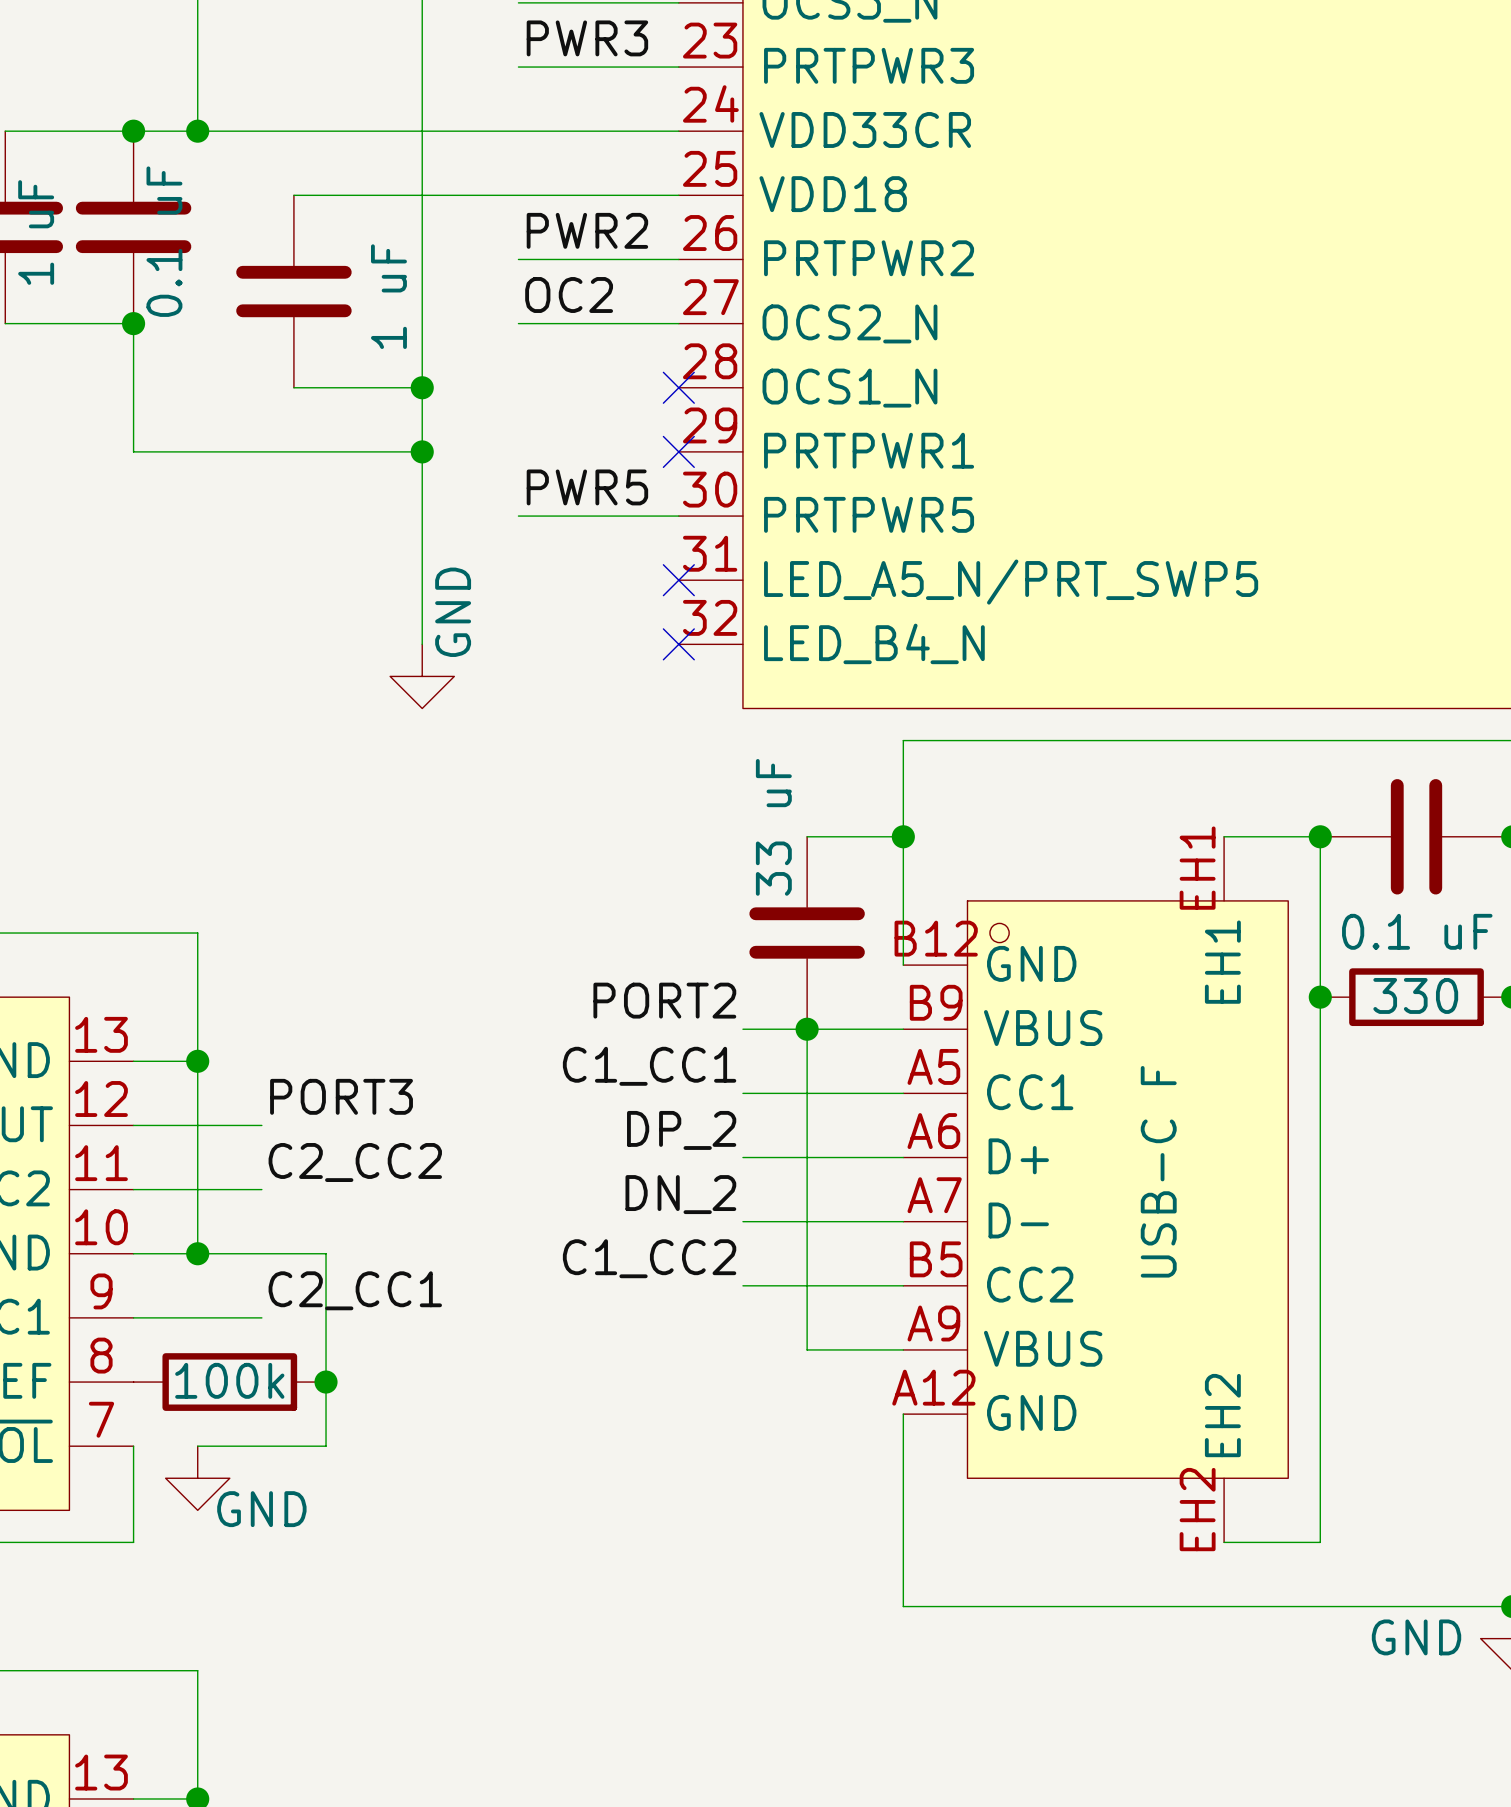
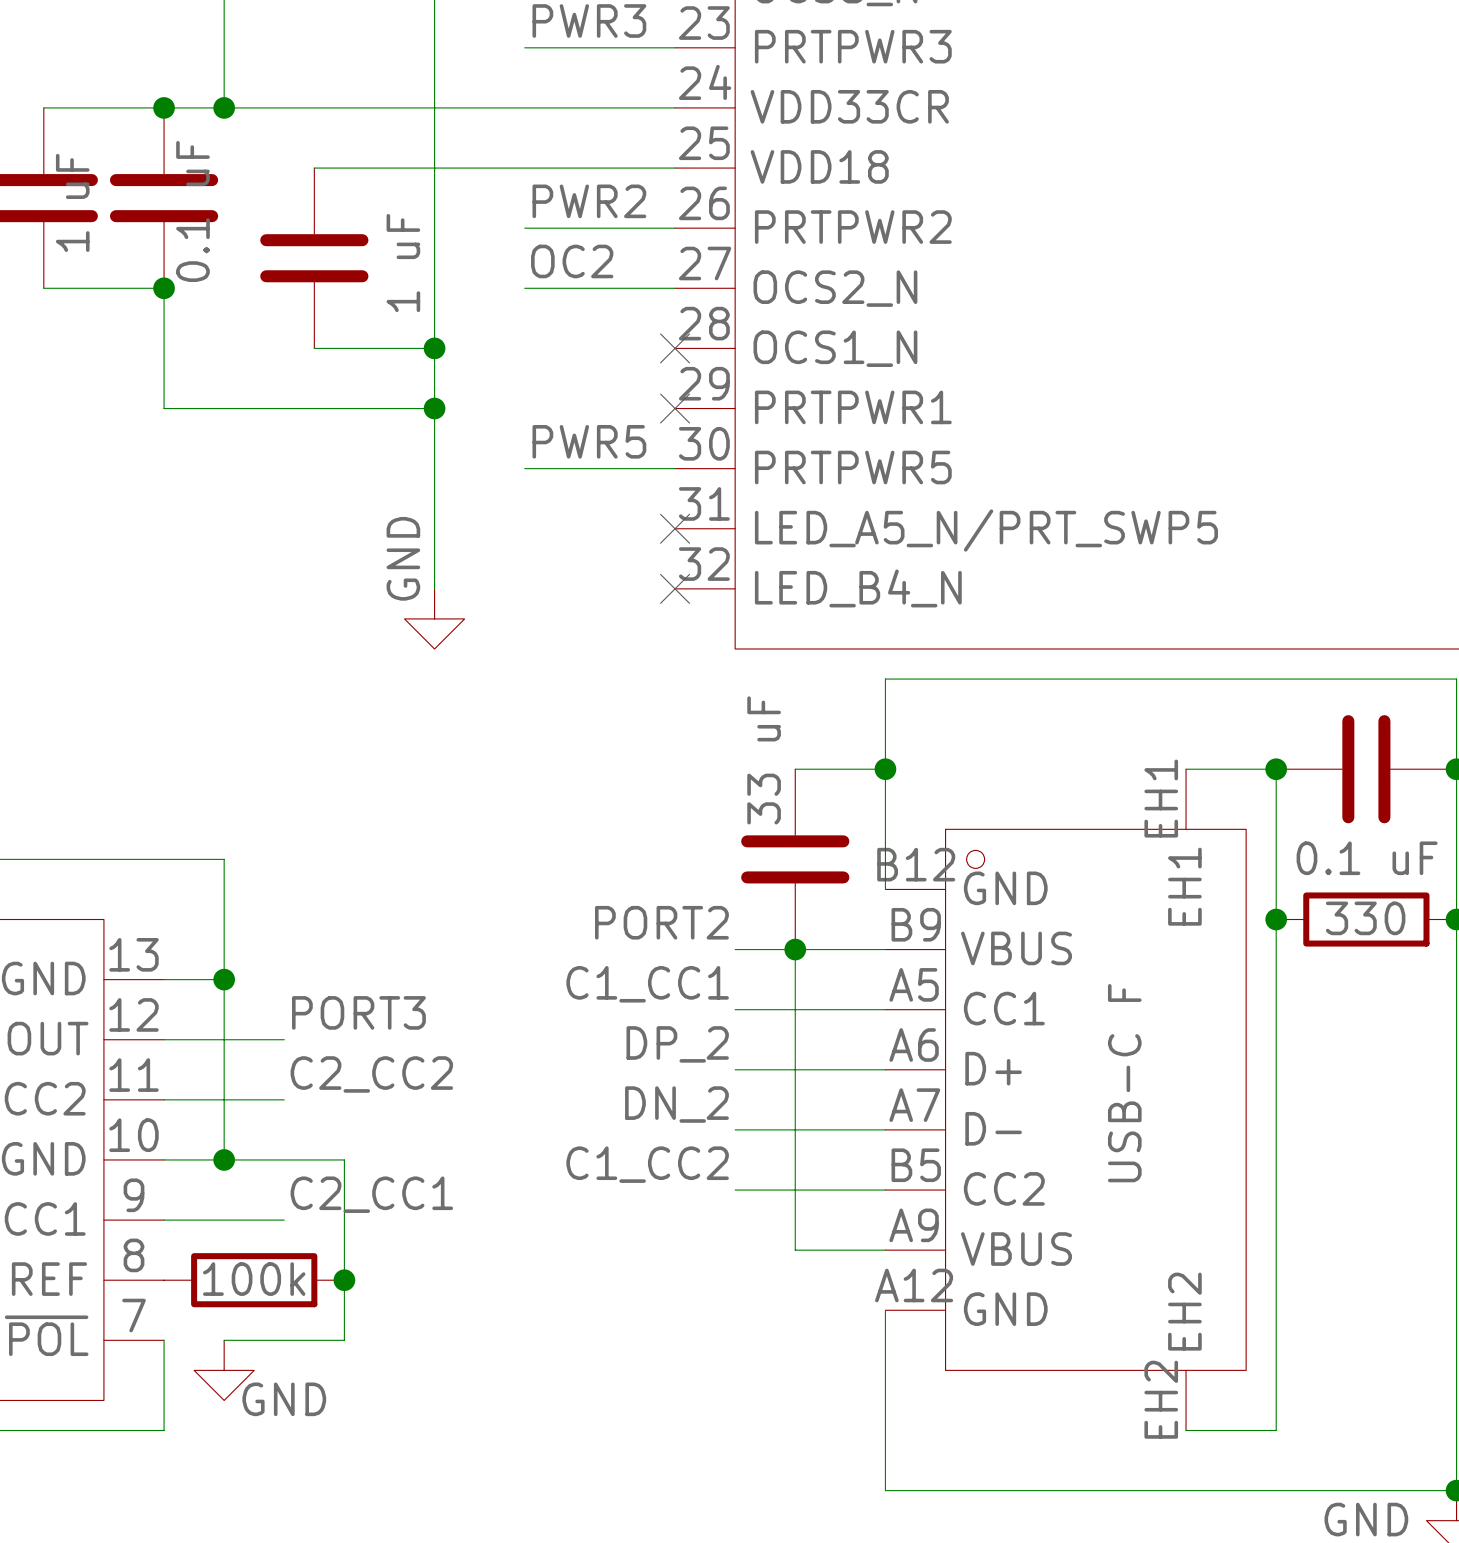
power symbol text position: GND (453, 612) -> GND (403, 558)

